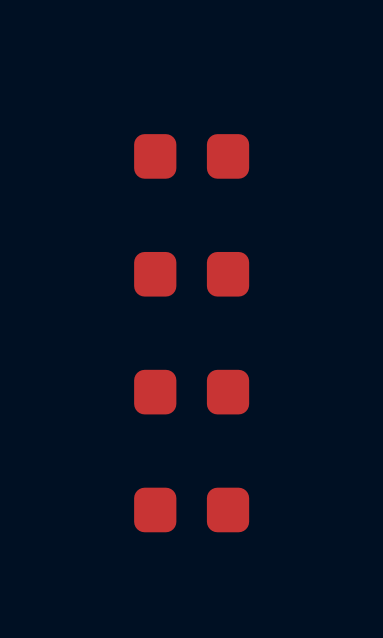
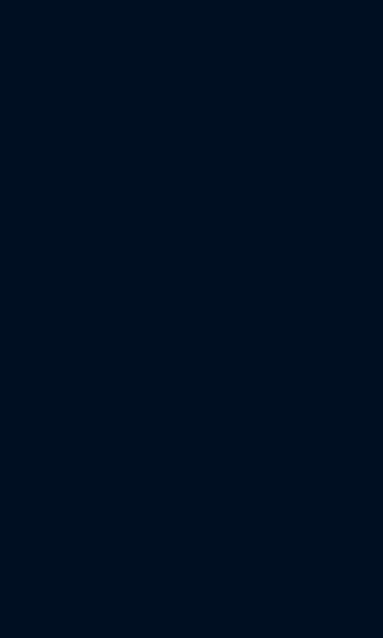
part: (191, 156) -> none
part: (191, 274) -> none
part: (191, 392) -> none
part: (191, 509) -> none

